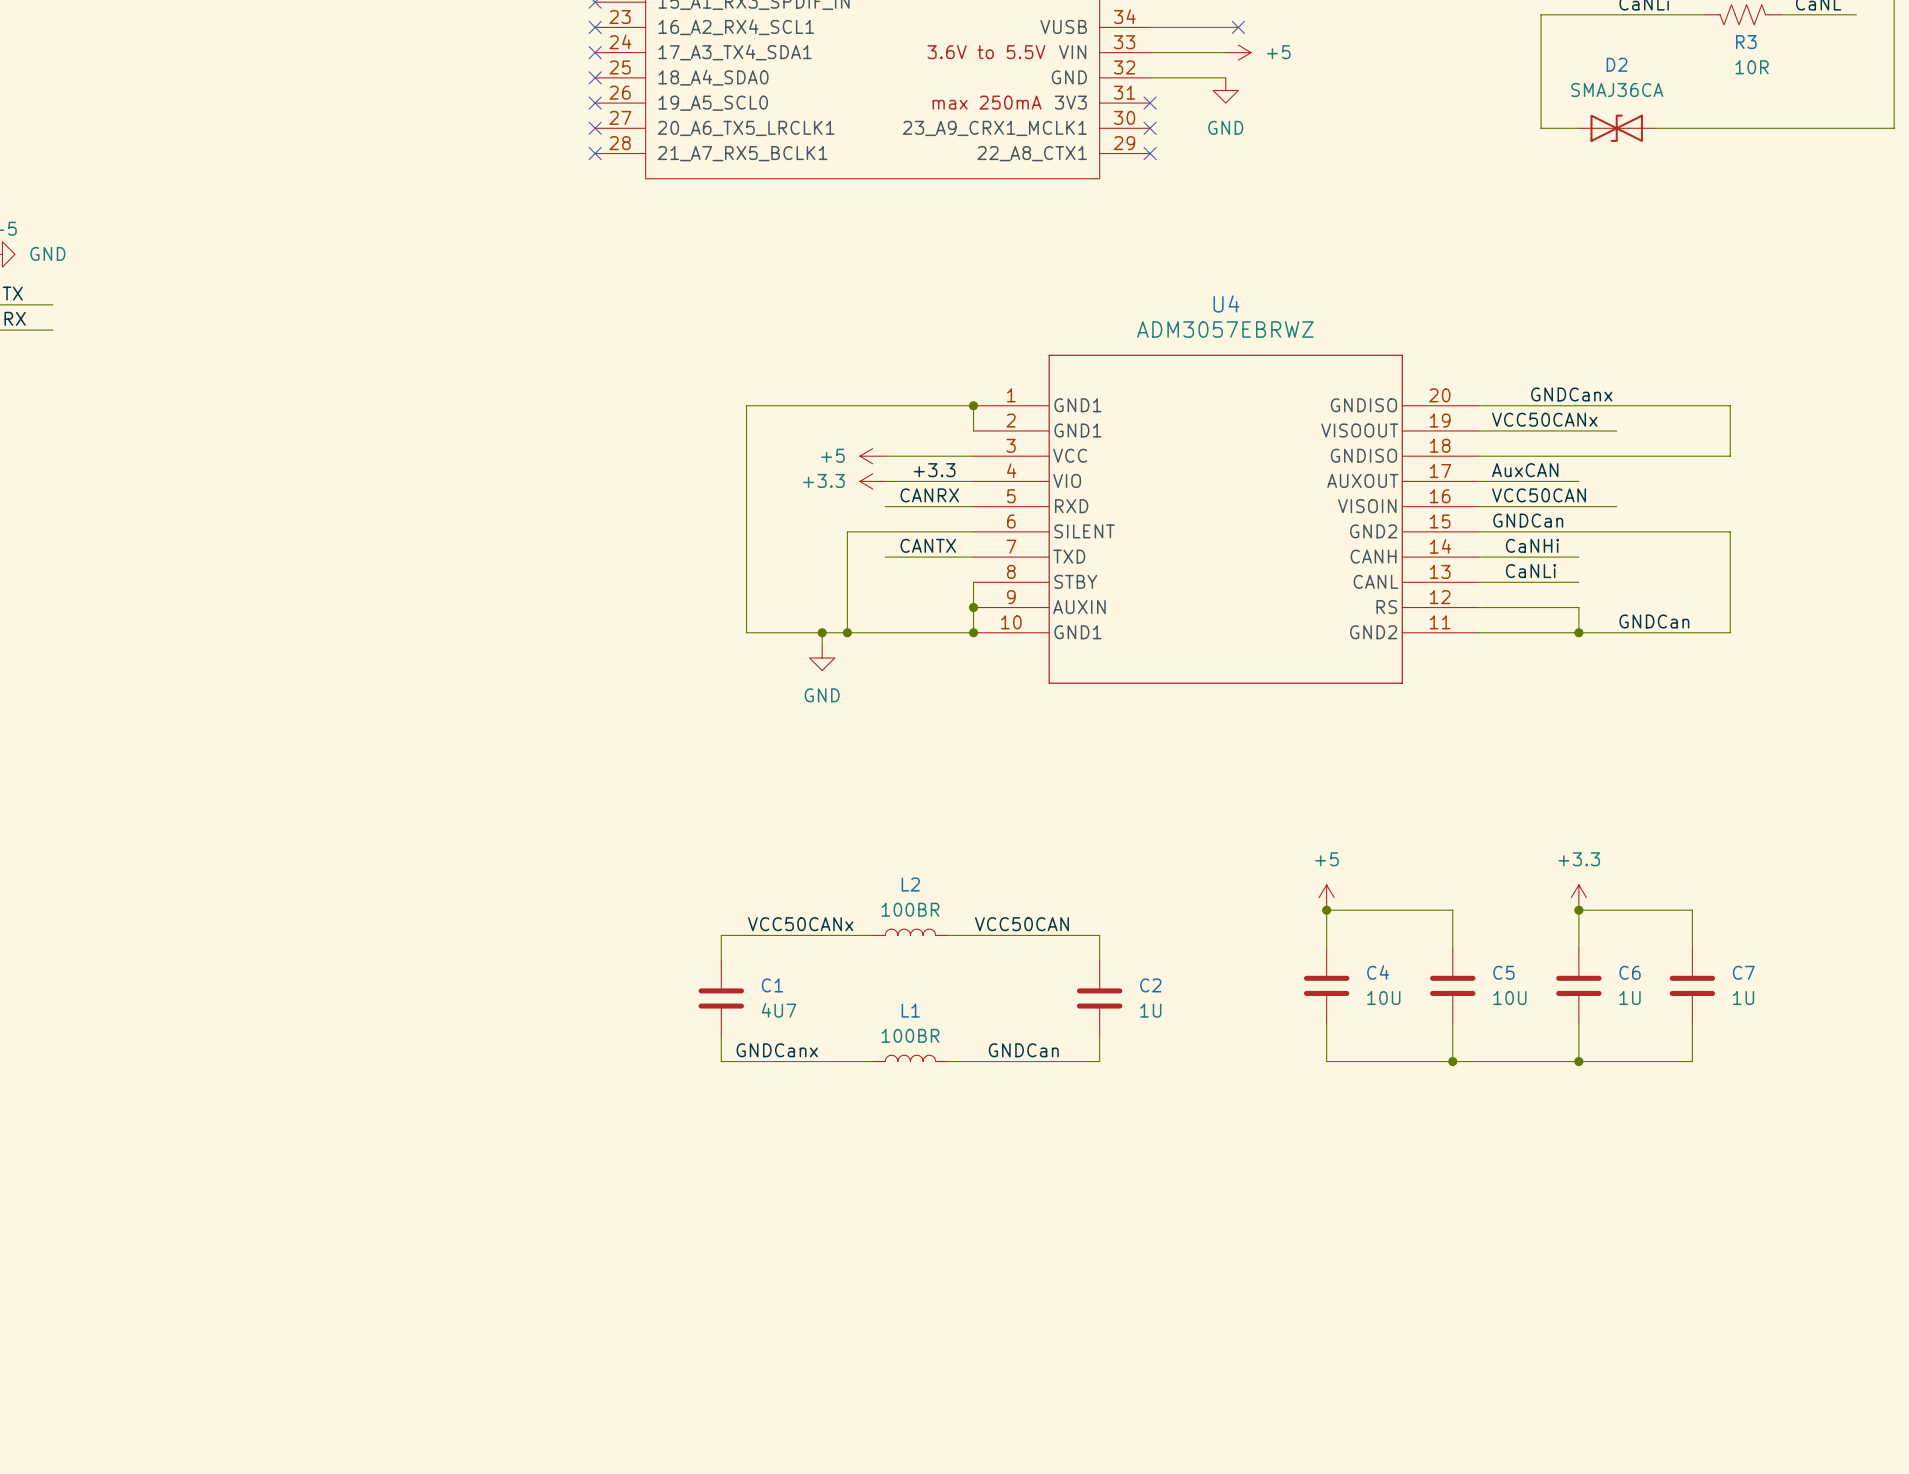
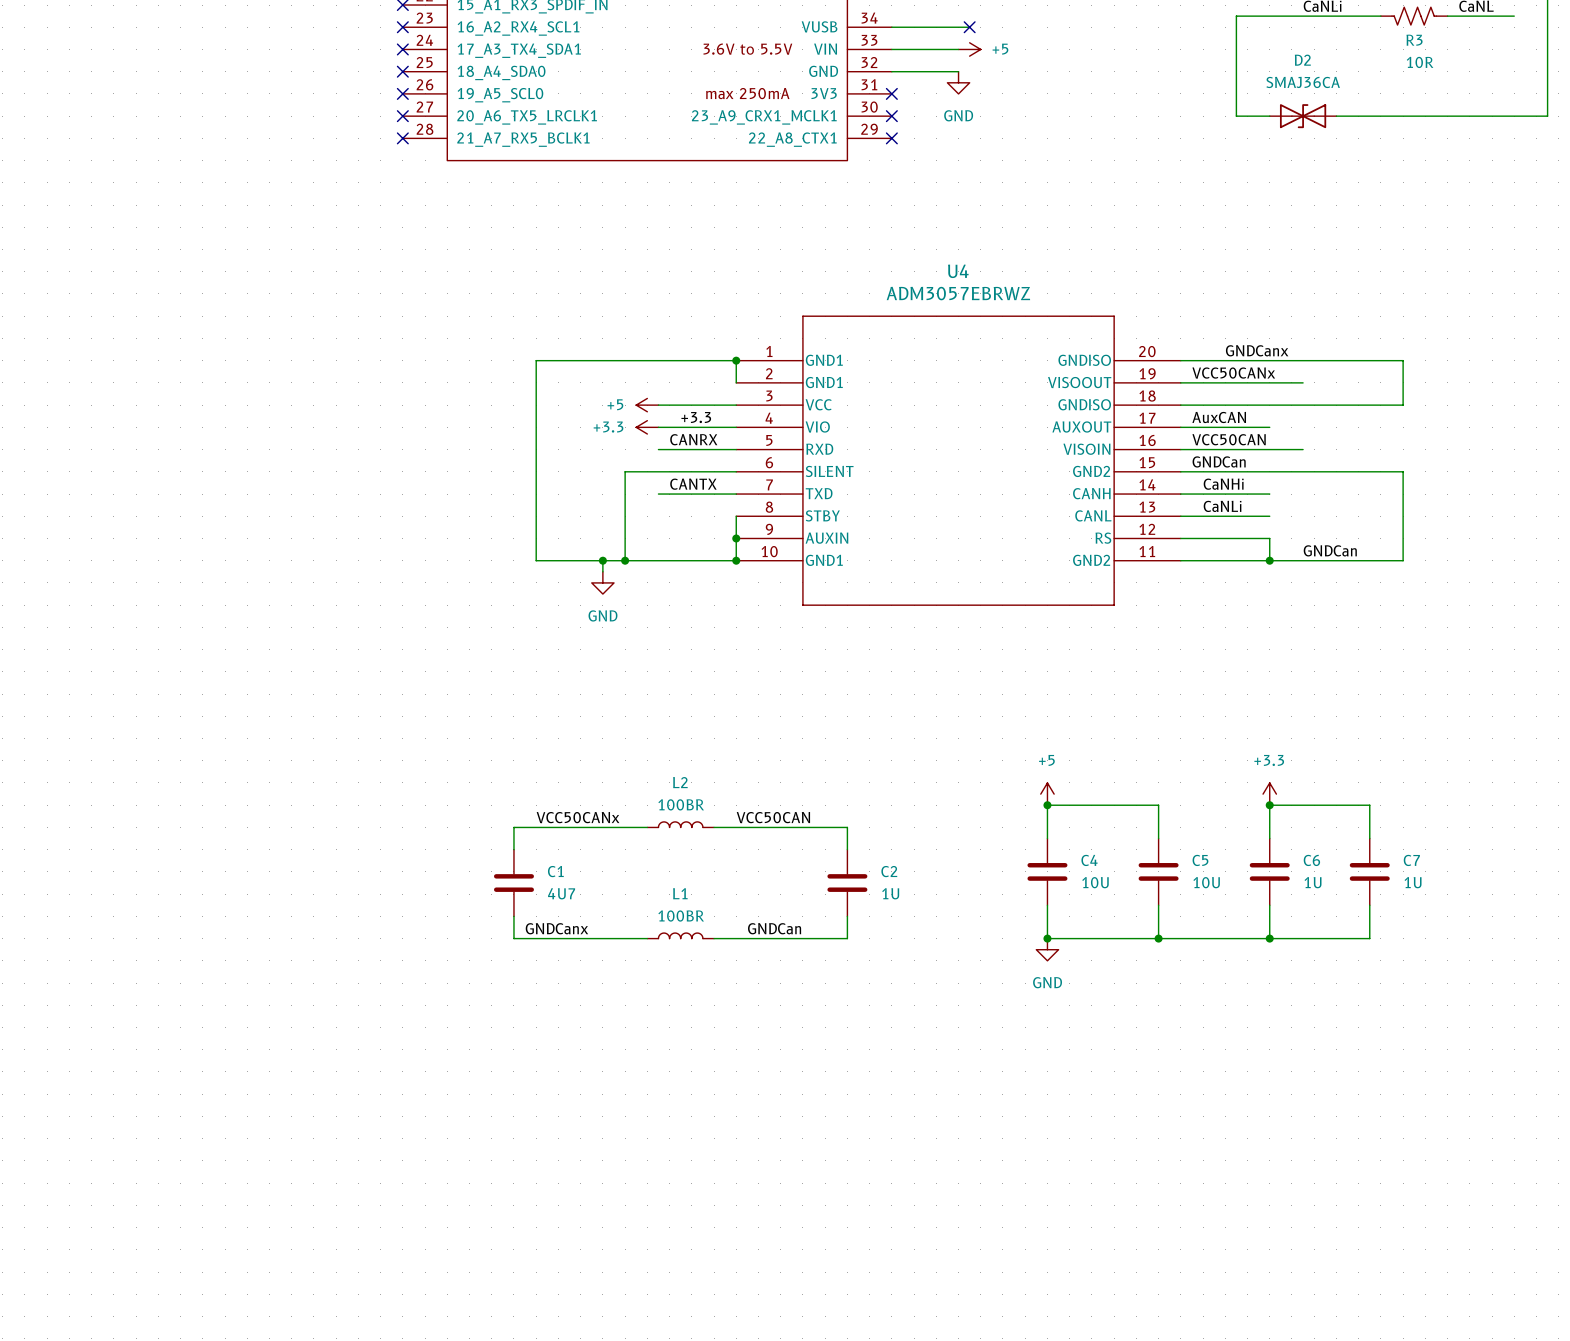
junction: none -> (1047, 938)
power symbol: none -> GND (1047, 949)

